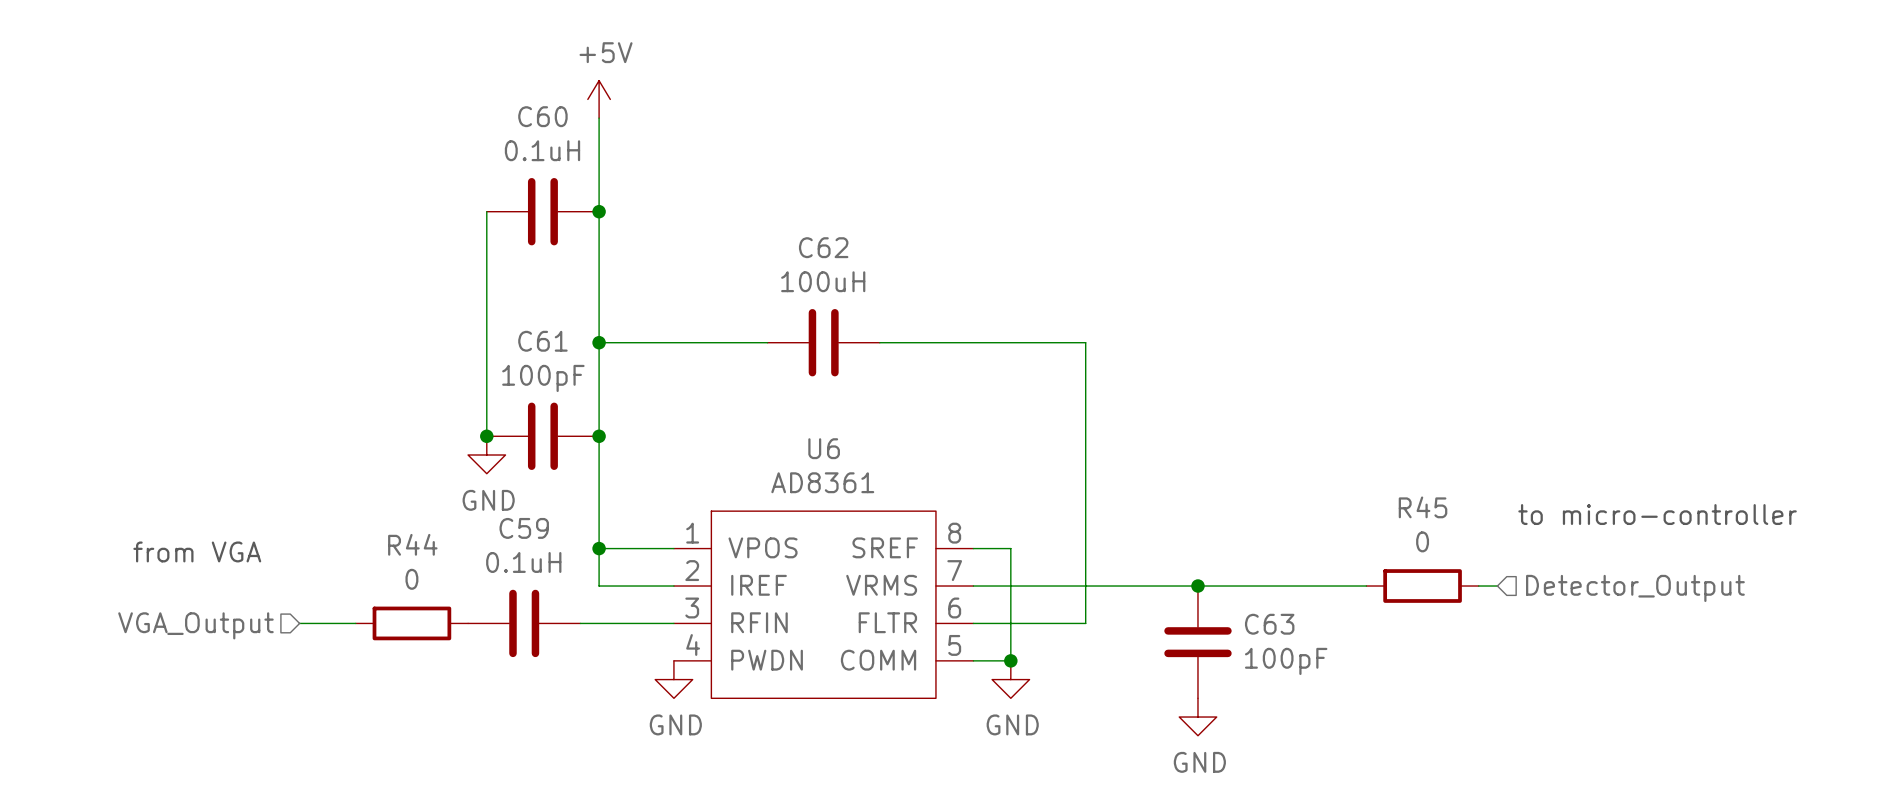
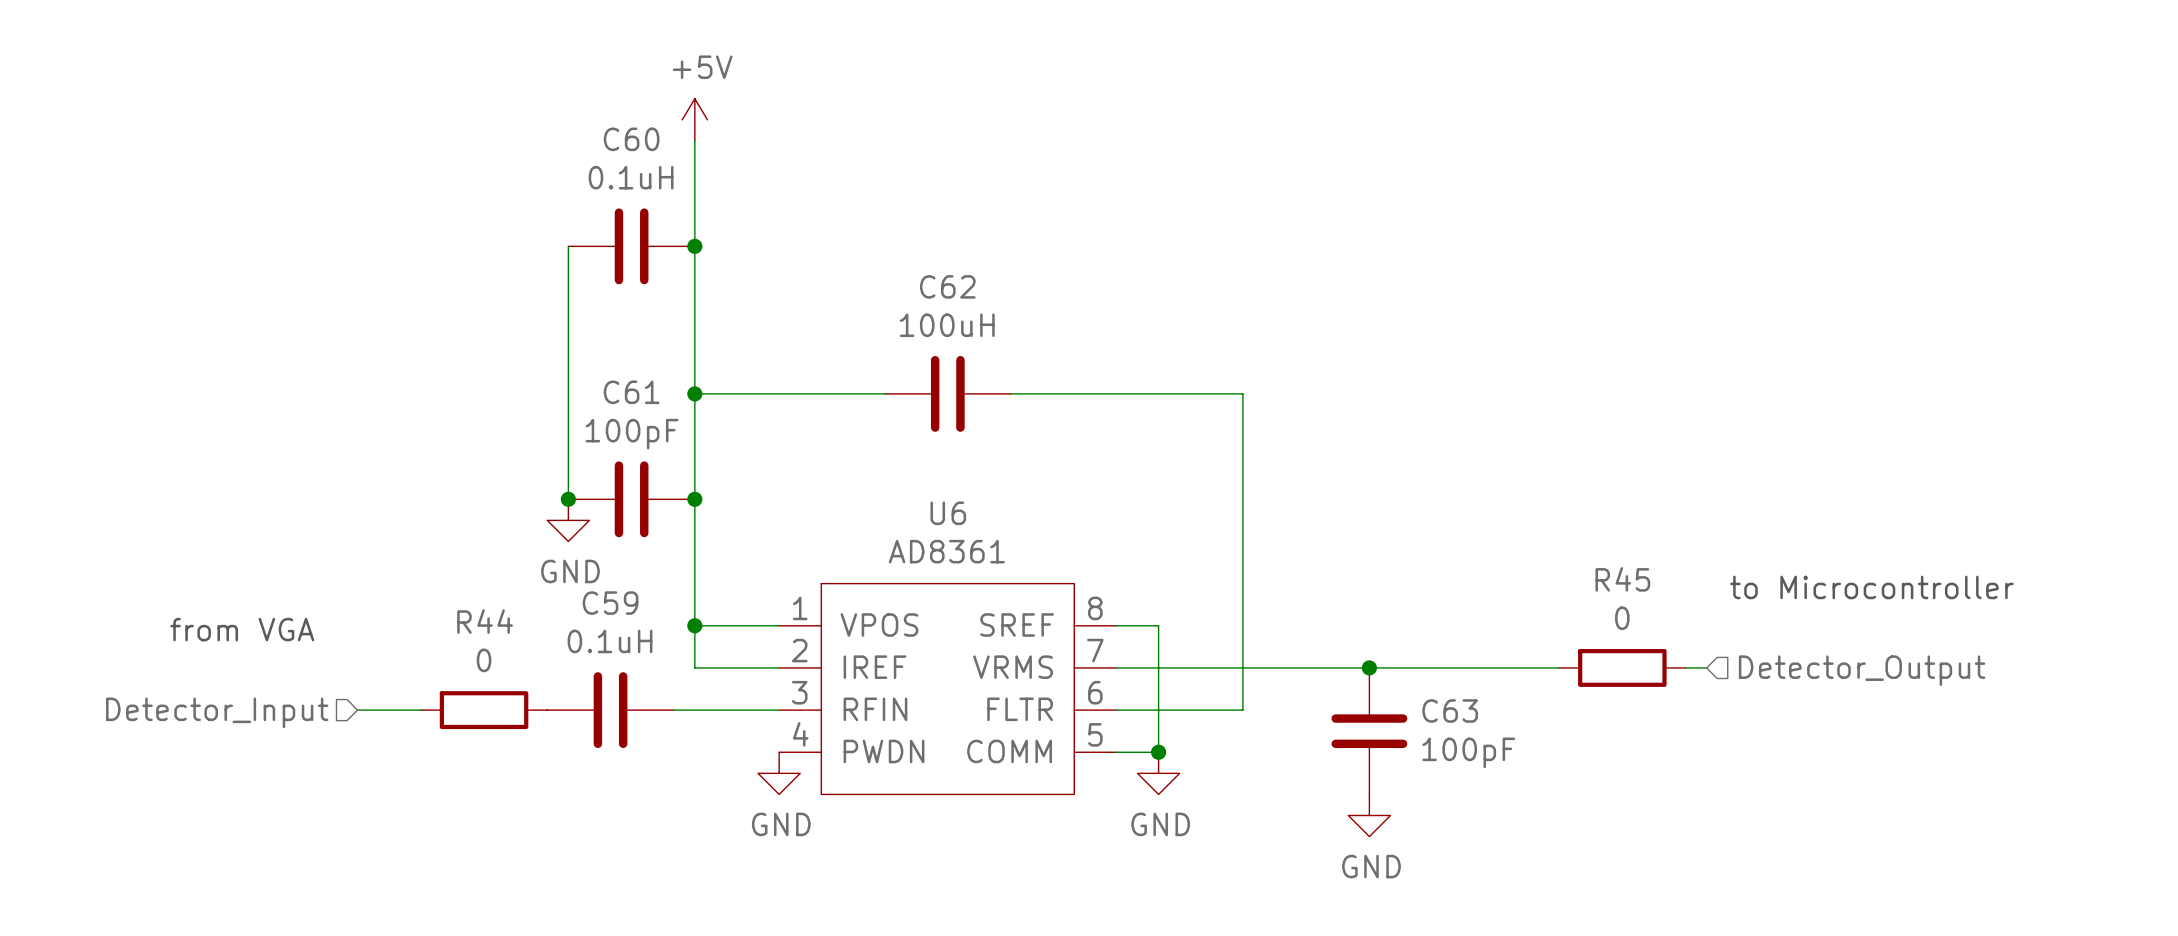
text: to micro-controller (1657, 514) -> to Microcontroller (1871, 587)
hierarchical label: VGA_Output (195, 625) -> Detector_Input (217, 712)

